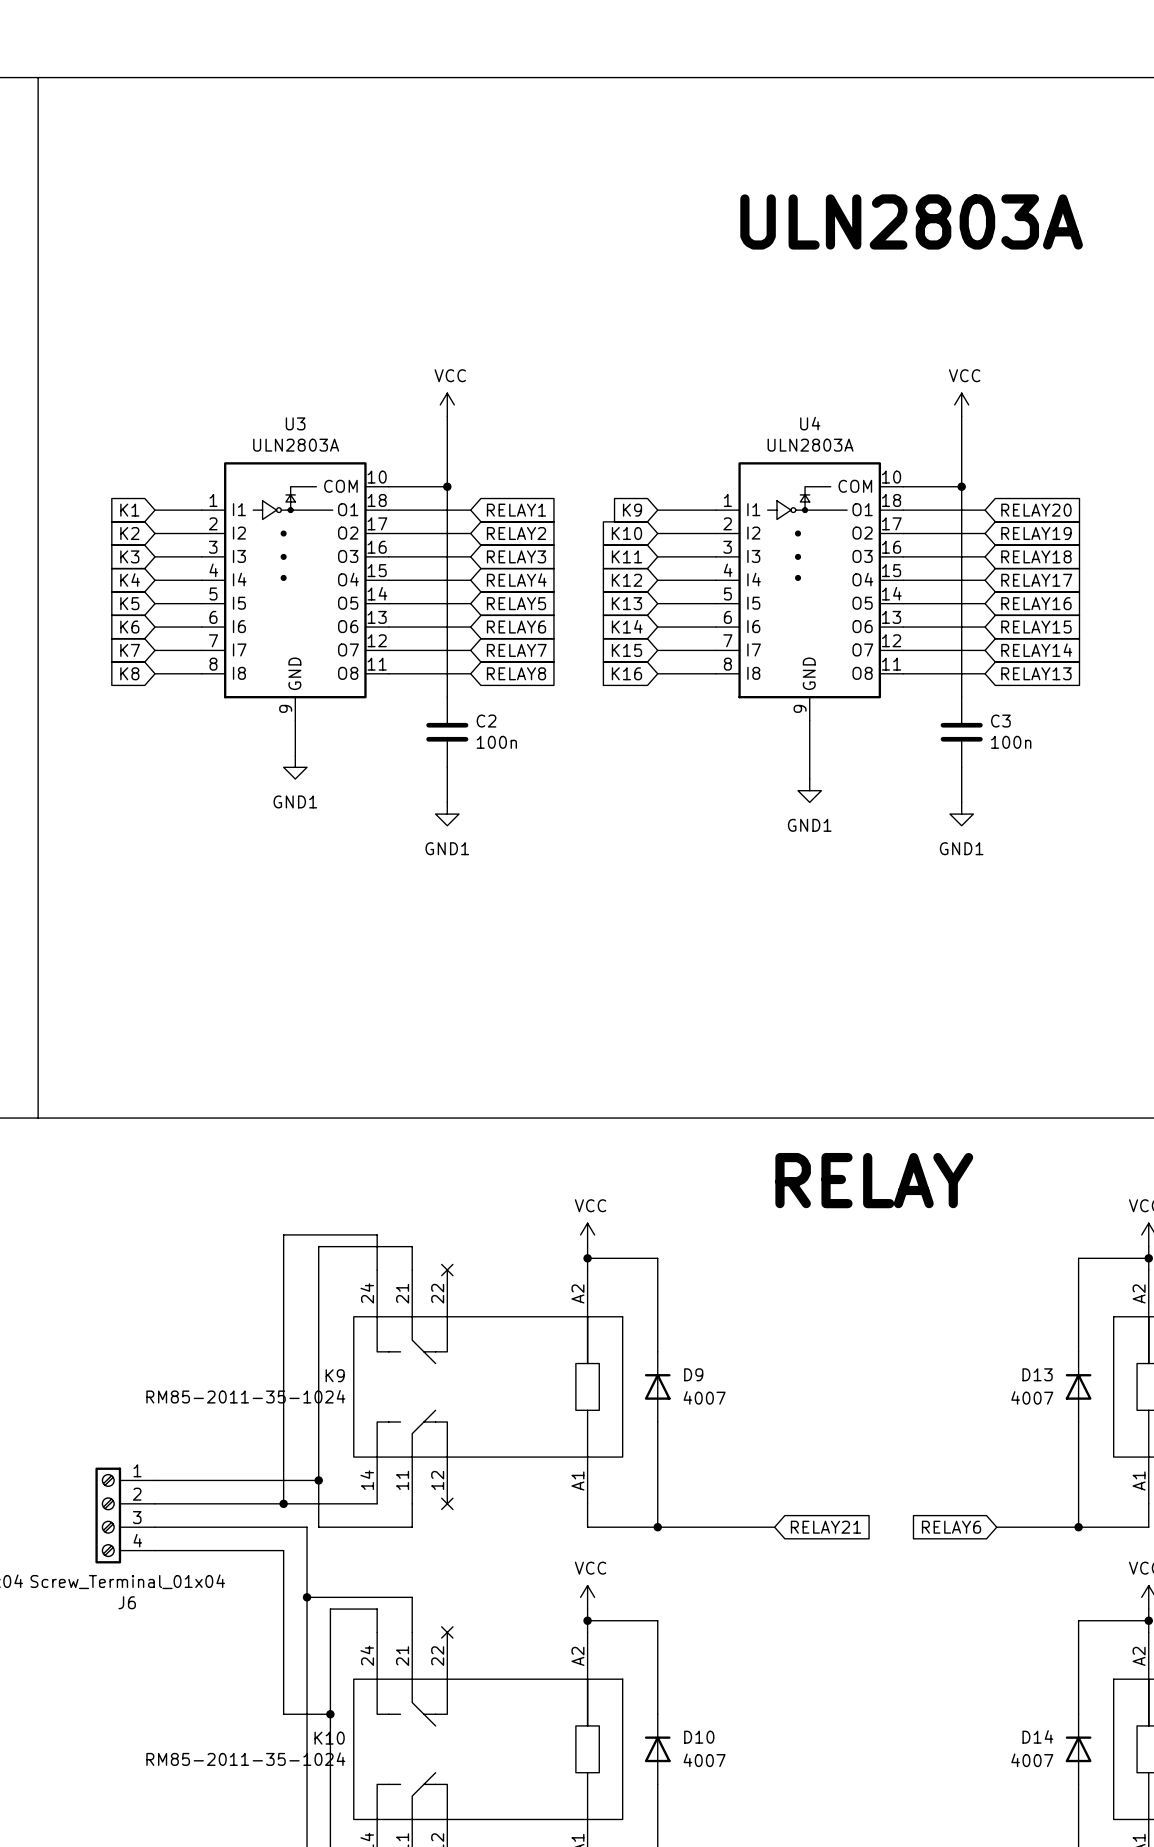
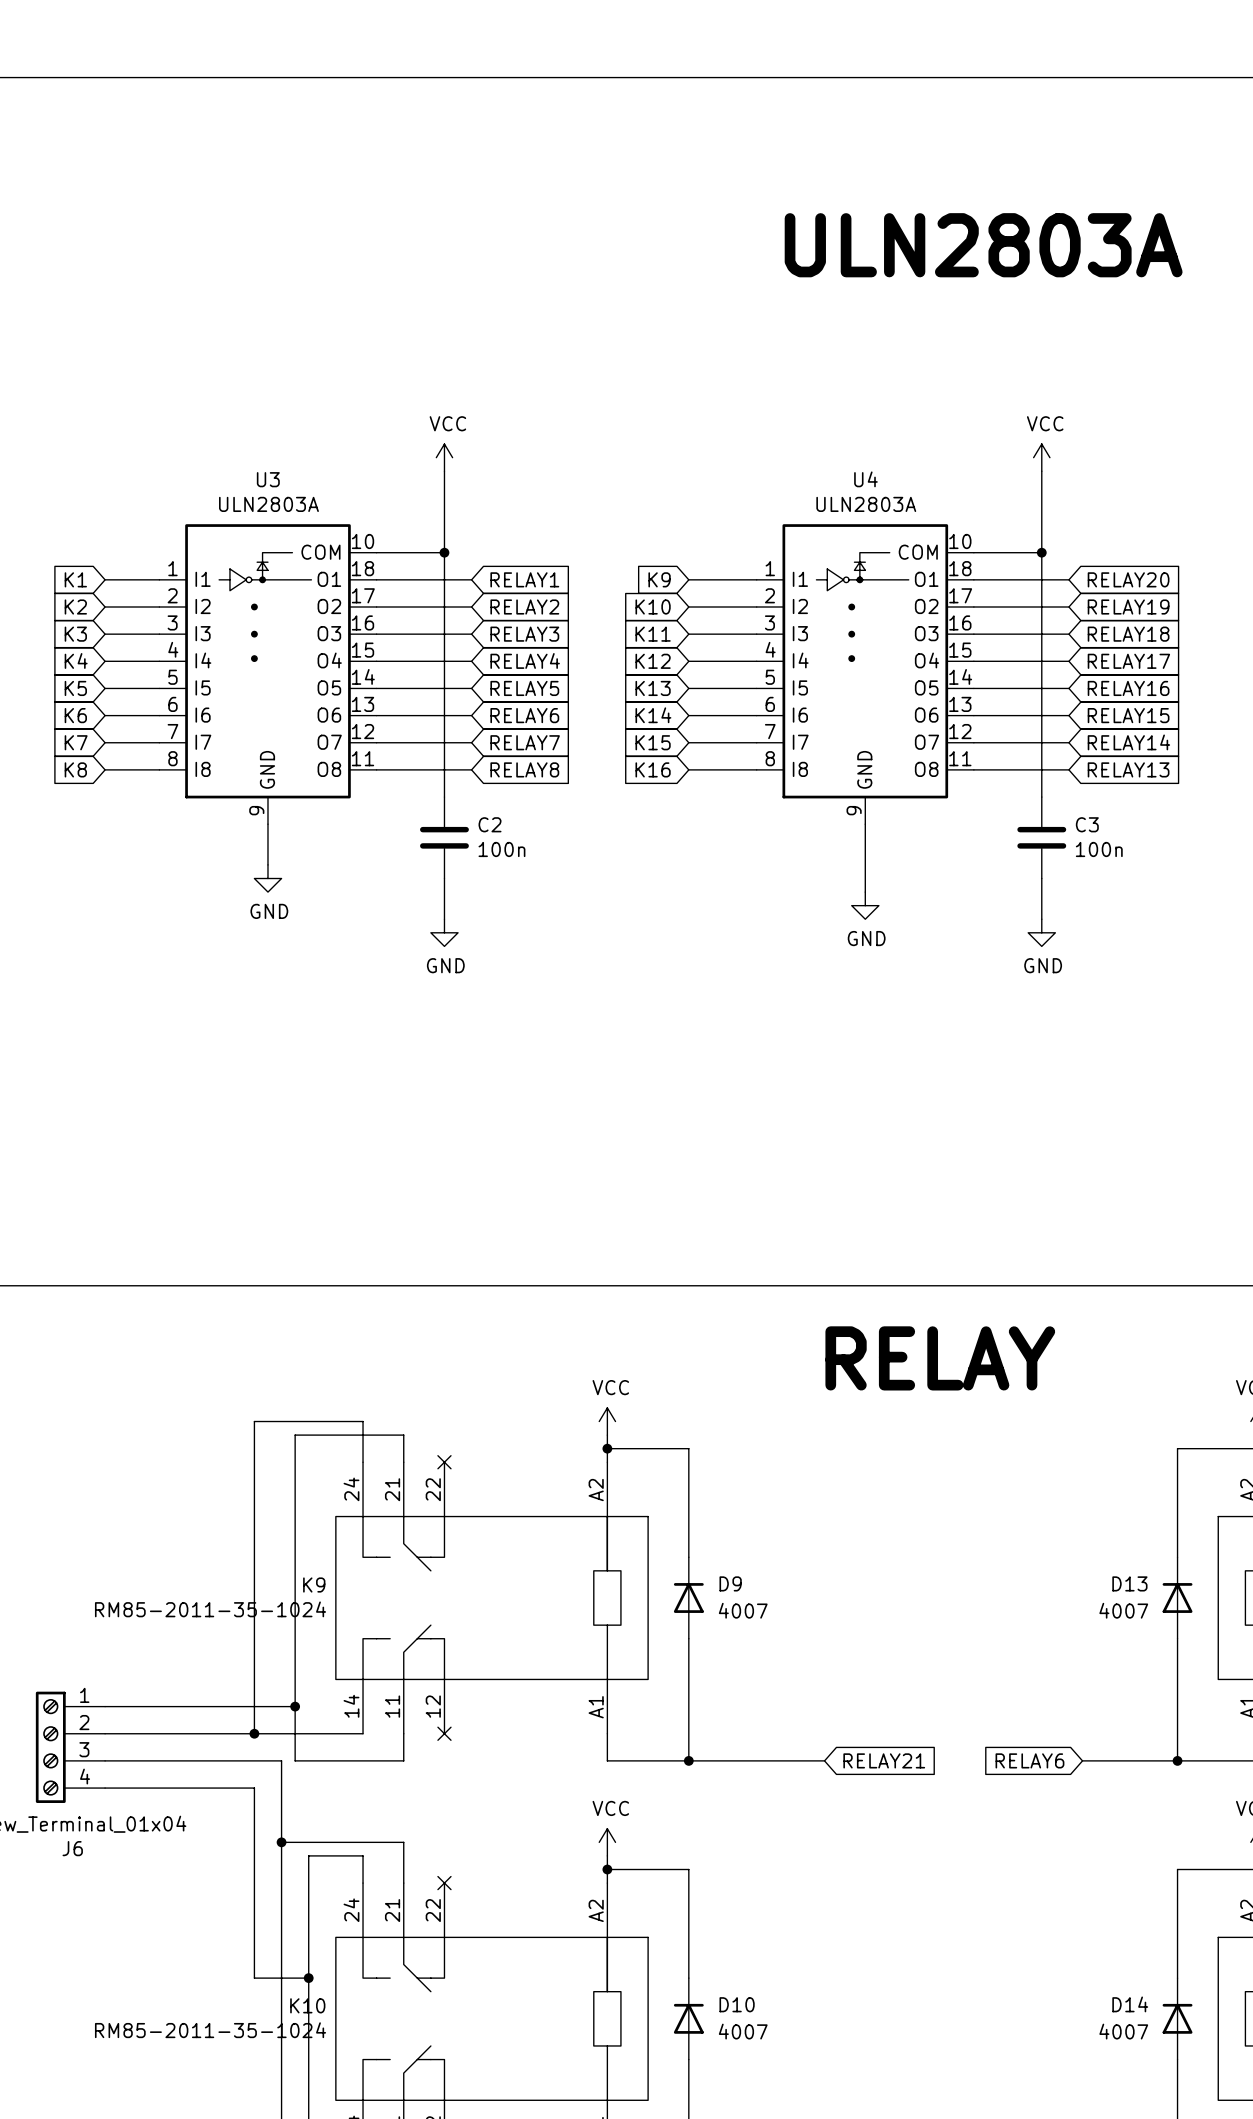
power symbol: GND1 (295, 767) -> GND (267, 878)
power symbol: GND1 (809, 790) -> GND (865, 905)
power symbol: GND1 (447, 814) -> GND (444, 932)
power symbol: GND1 (961, 814) -> GND (1041, 932)

